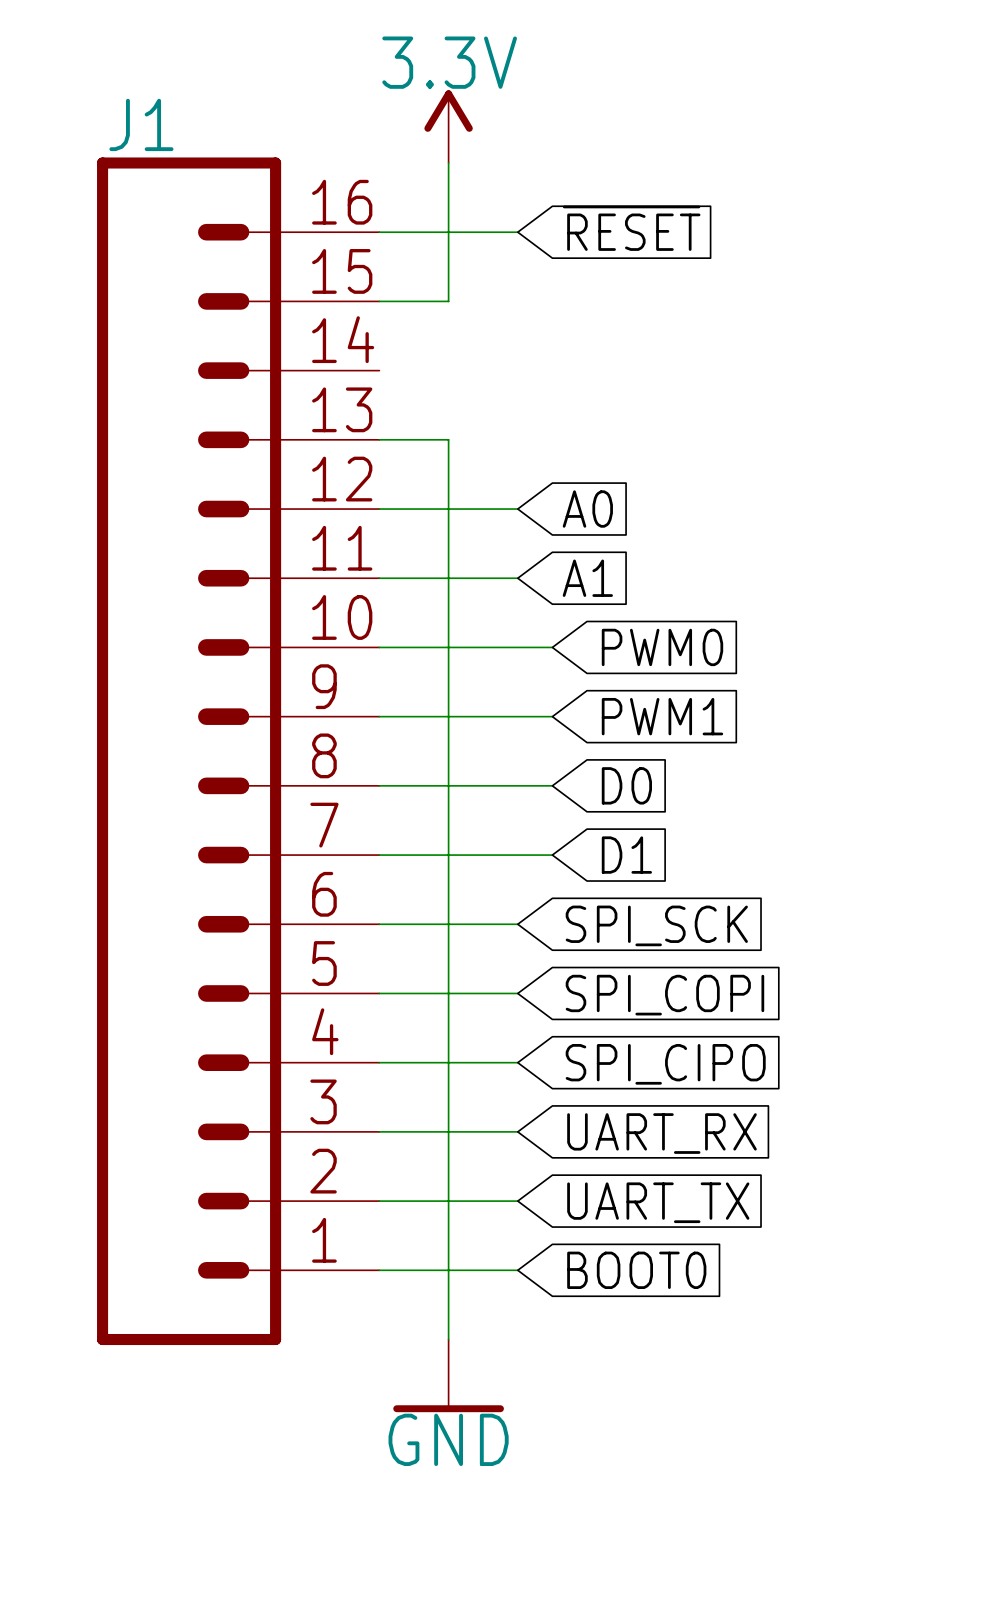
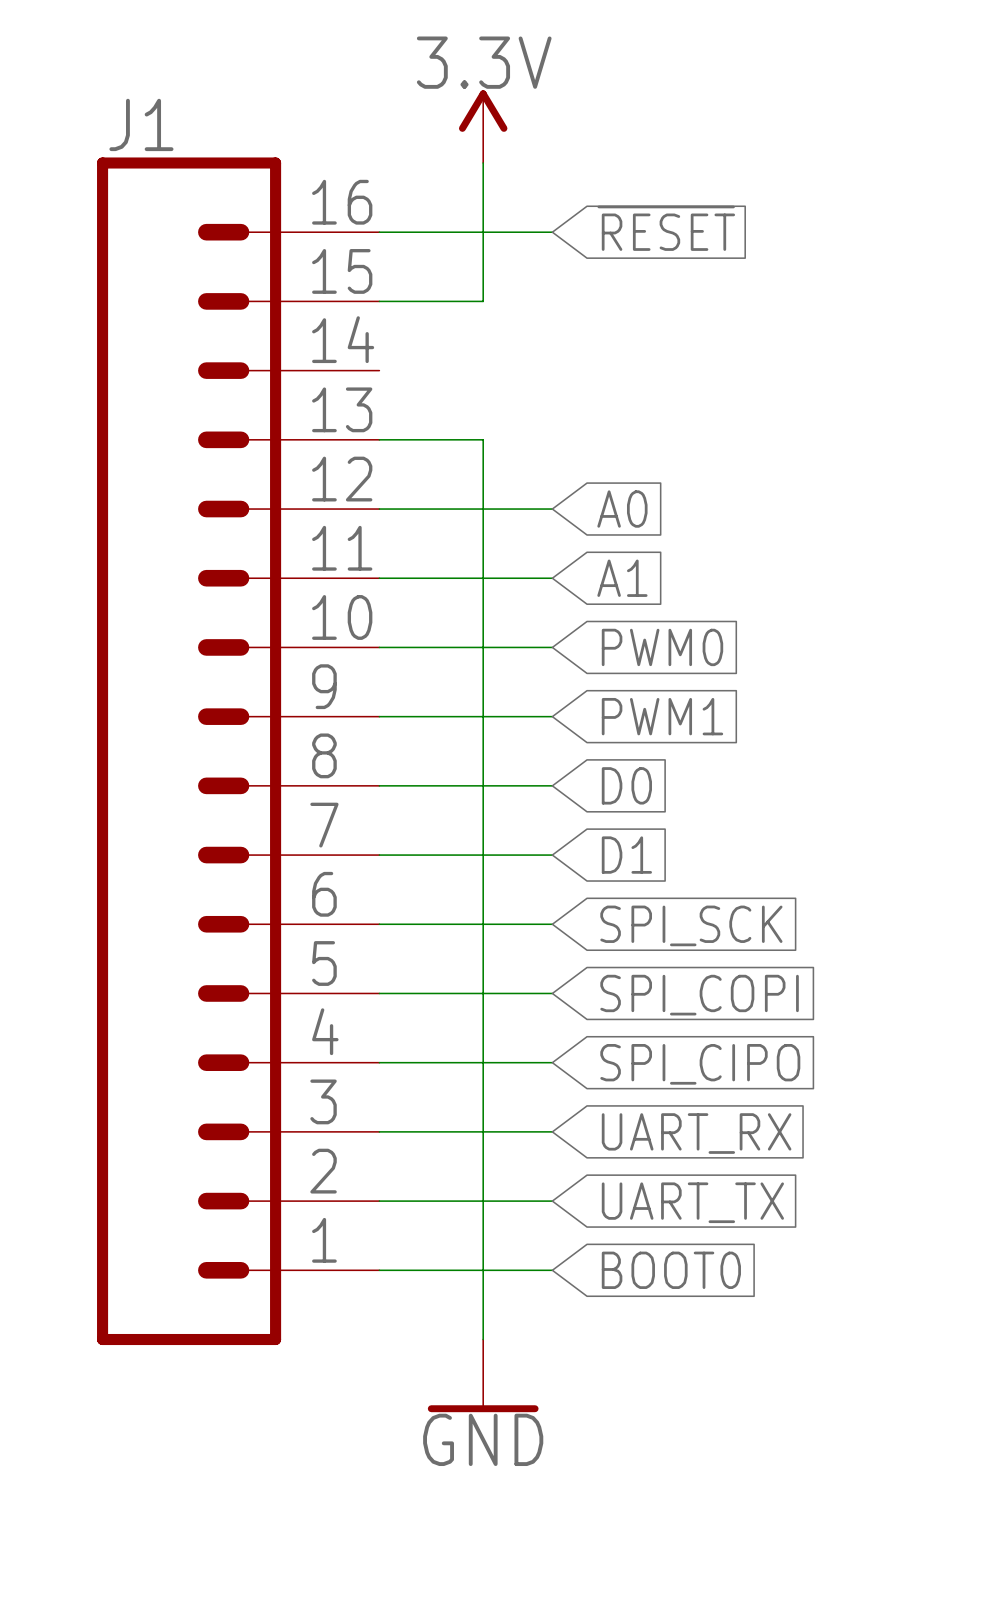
power symbol position: 3.3V (448, 126) -> 3.3V (483, 126)
wire: (448, 163) (448, 301) -> (483, 163) (483, 301) (448, 301)
global label position: ~{RESET} (631, 228) -> ~{RESET} (666, 228)
wire: none -> (517, 232) (552, 232)
wire: (448, 439) (448, 1339) -> (448, 439) (483, 439) (483, 1339)
wire: none -> (517, 509) (552, 509)
global label position: A0 (587, 509) -> A0 (622, 509)
wire: none -> (517, 578) (552, 578)
global label position: A1 (587, 578) -> A1 (622, 578)
wire: none -> (517, 924) (552, 924)
global label position: SPI_SCK (656, 925) -> SPI_SCK (691, 925)
wire: none -> (517, 993) (552, 993)
global label position: SPI_COPI (664, 995) -> SPI_COPI (699, 995)
wire: none -> (517, 1062) (552, 1062)
global label position: SPI_CIPO (665, 1064) -> SPI_CIPO (700, 1064)
wire: none -> (517, 1131) (552, 1131)
global label position: UART_RX (661, 1133) -> UART_RX (696, 1133)
wire: none -> (517, 1201) (552, 1201)
global label position: UART_TX (658, 1202) -> UART_TX (692, 1202)
wire: none -> (517, 1270) (552, 1270)
global label position: BOOT0 (636, 1270) -> BOOT0 (671, 1270)
power symbol position: GND (448, 1375) -> GND (483, 1375)

